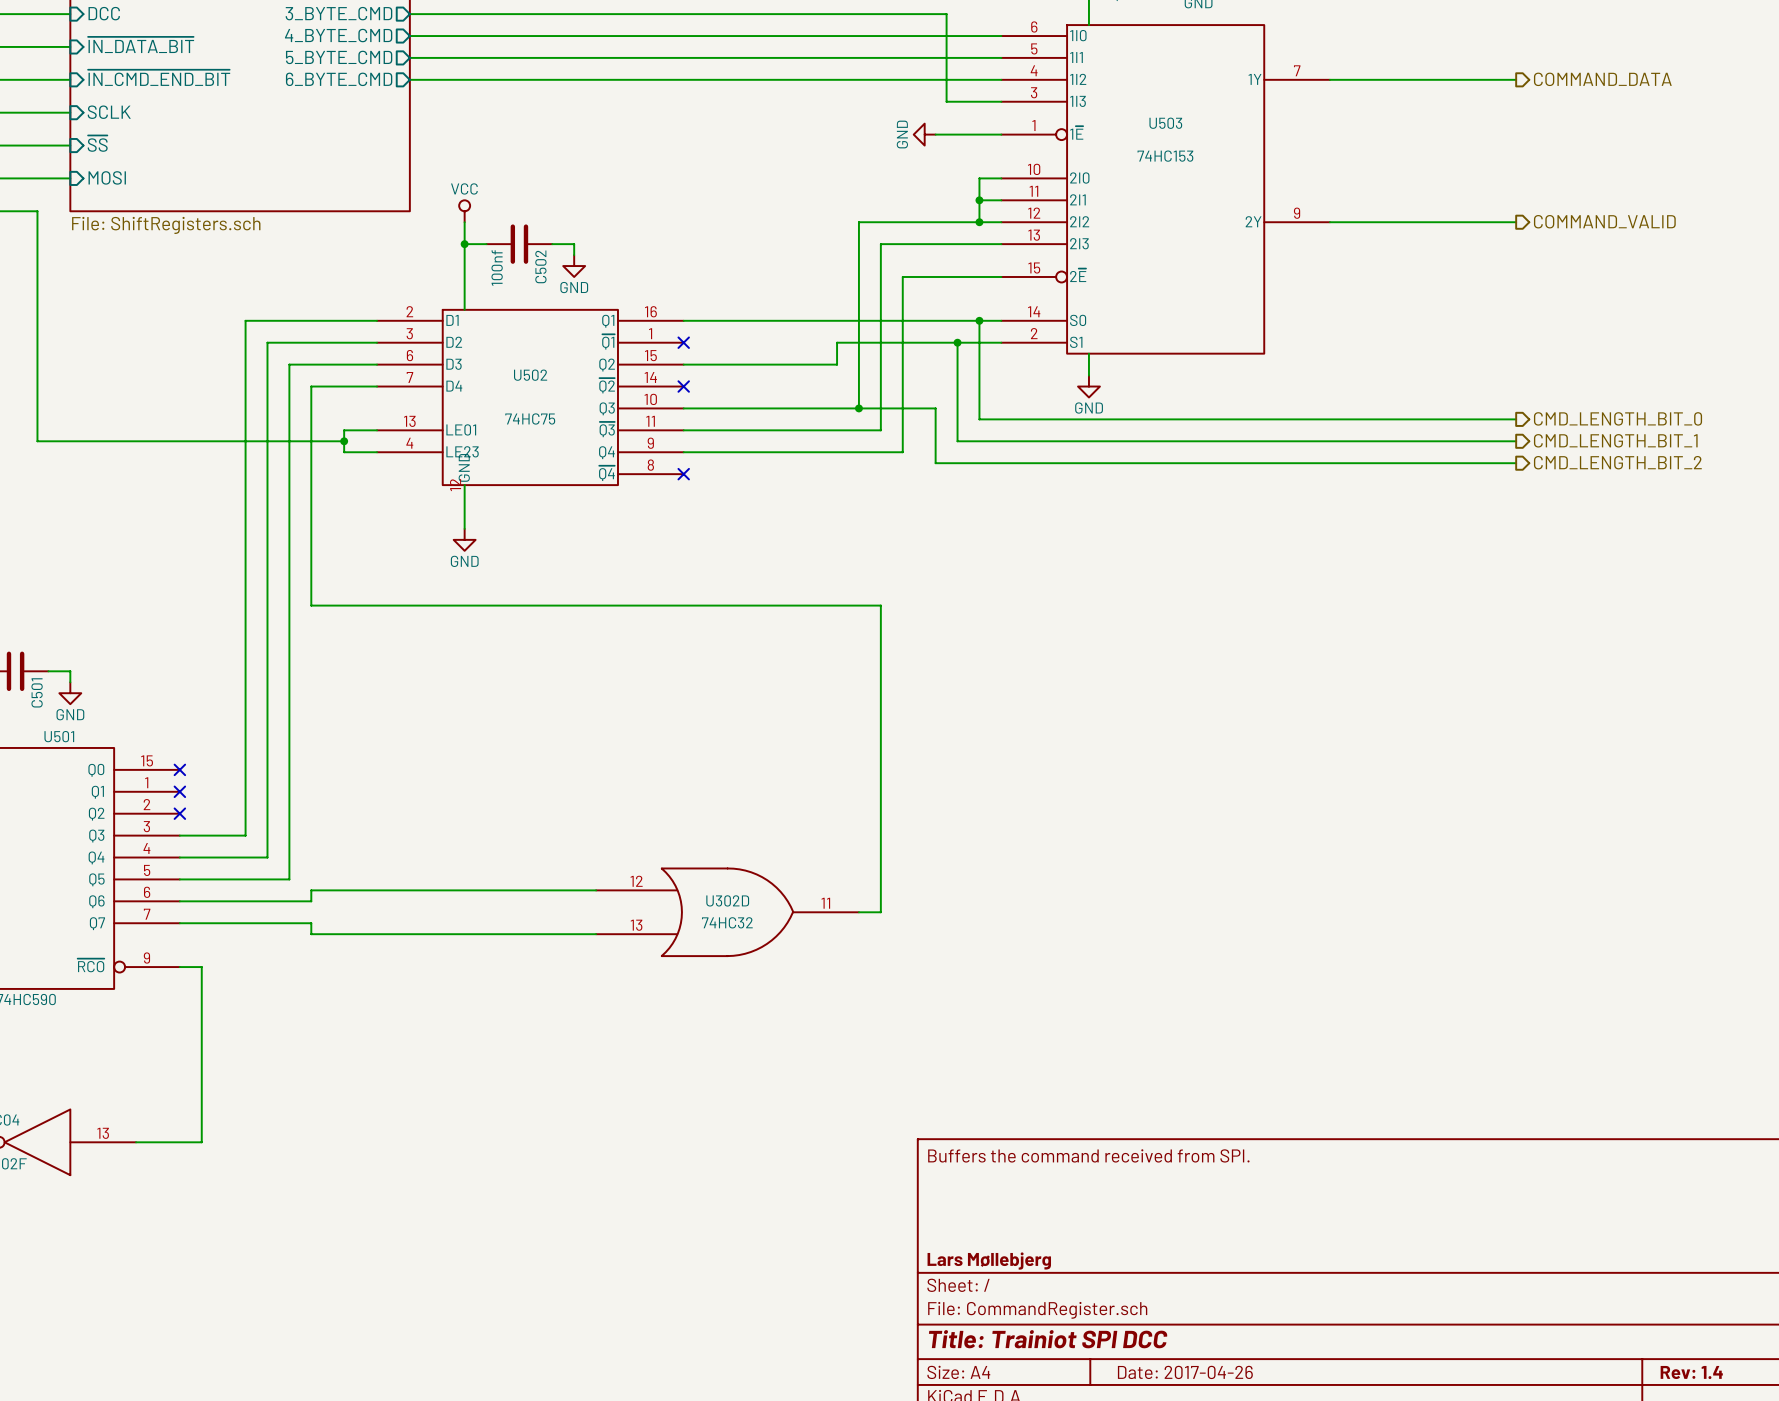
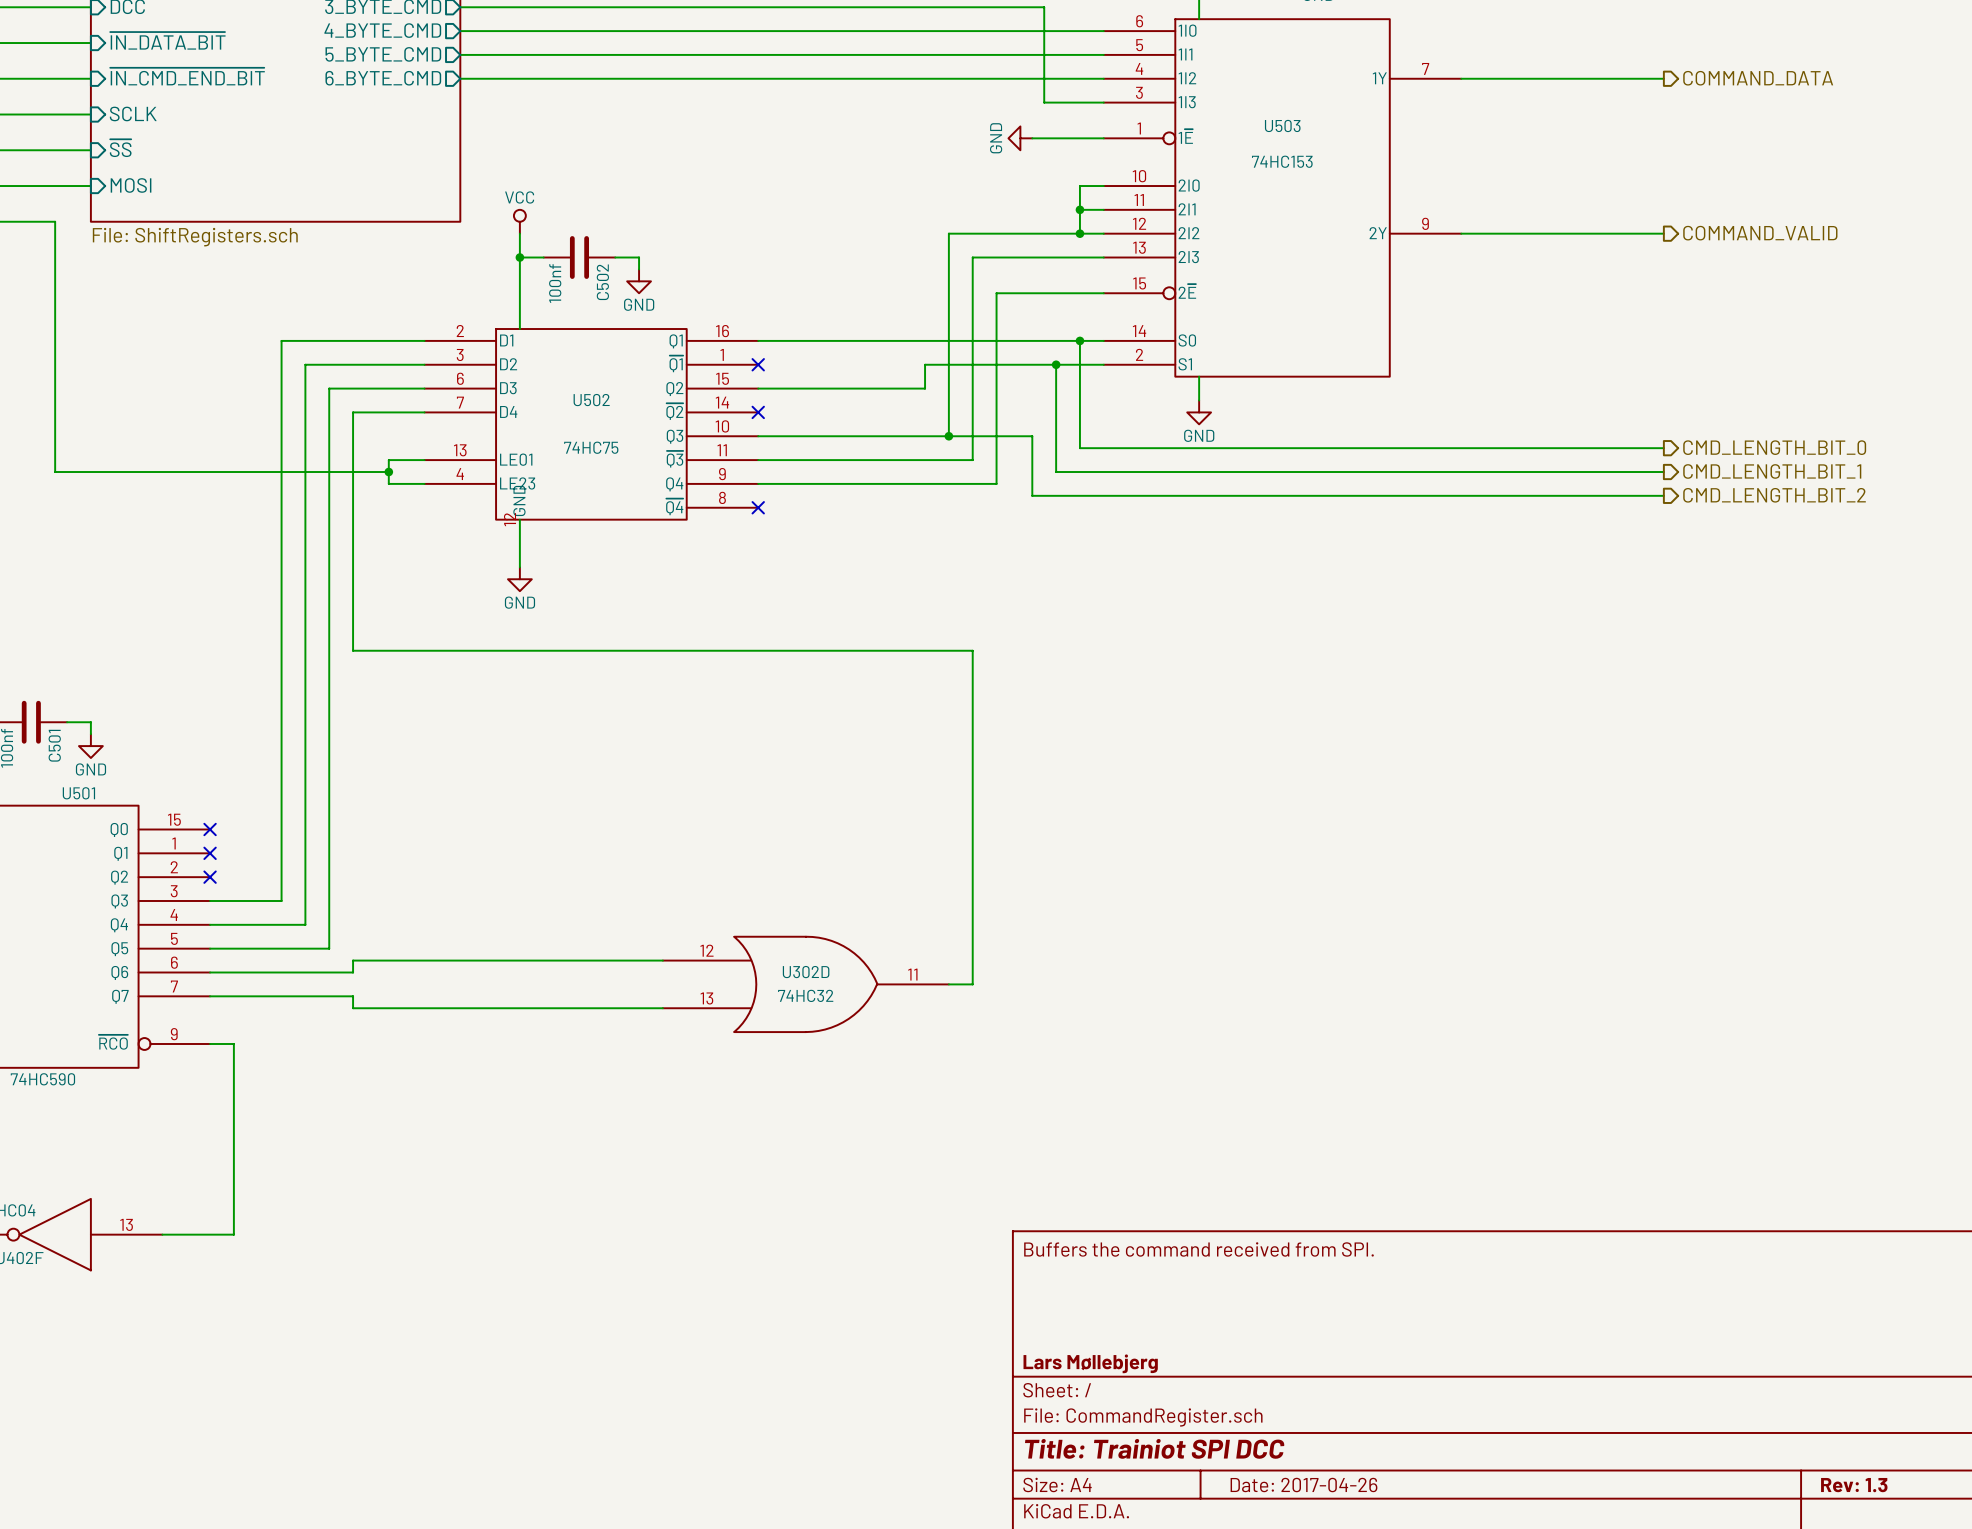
title block: Rev: 1.4 (1691, 1372) -> Rev: 1.3 (1854, 1485)

